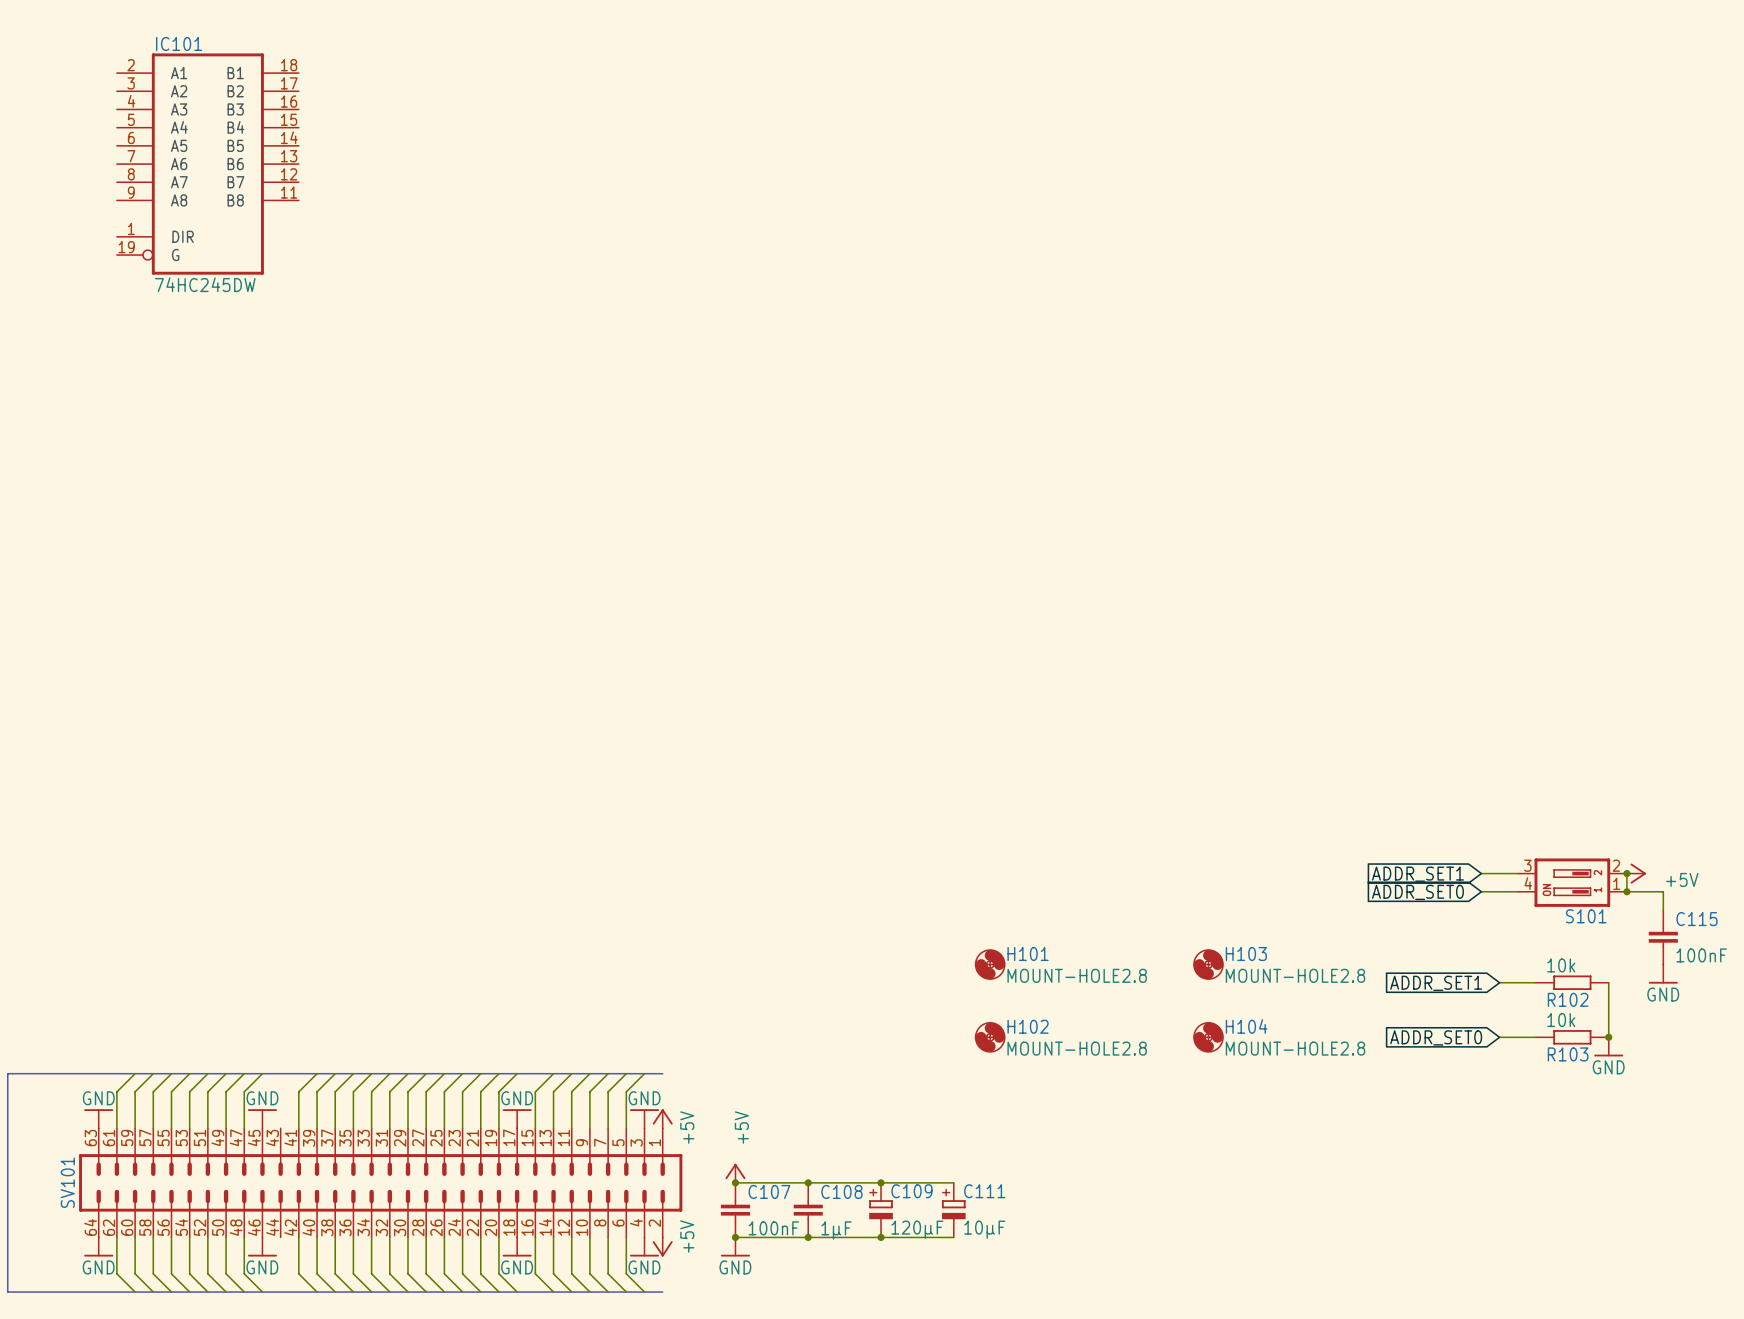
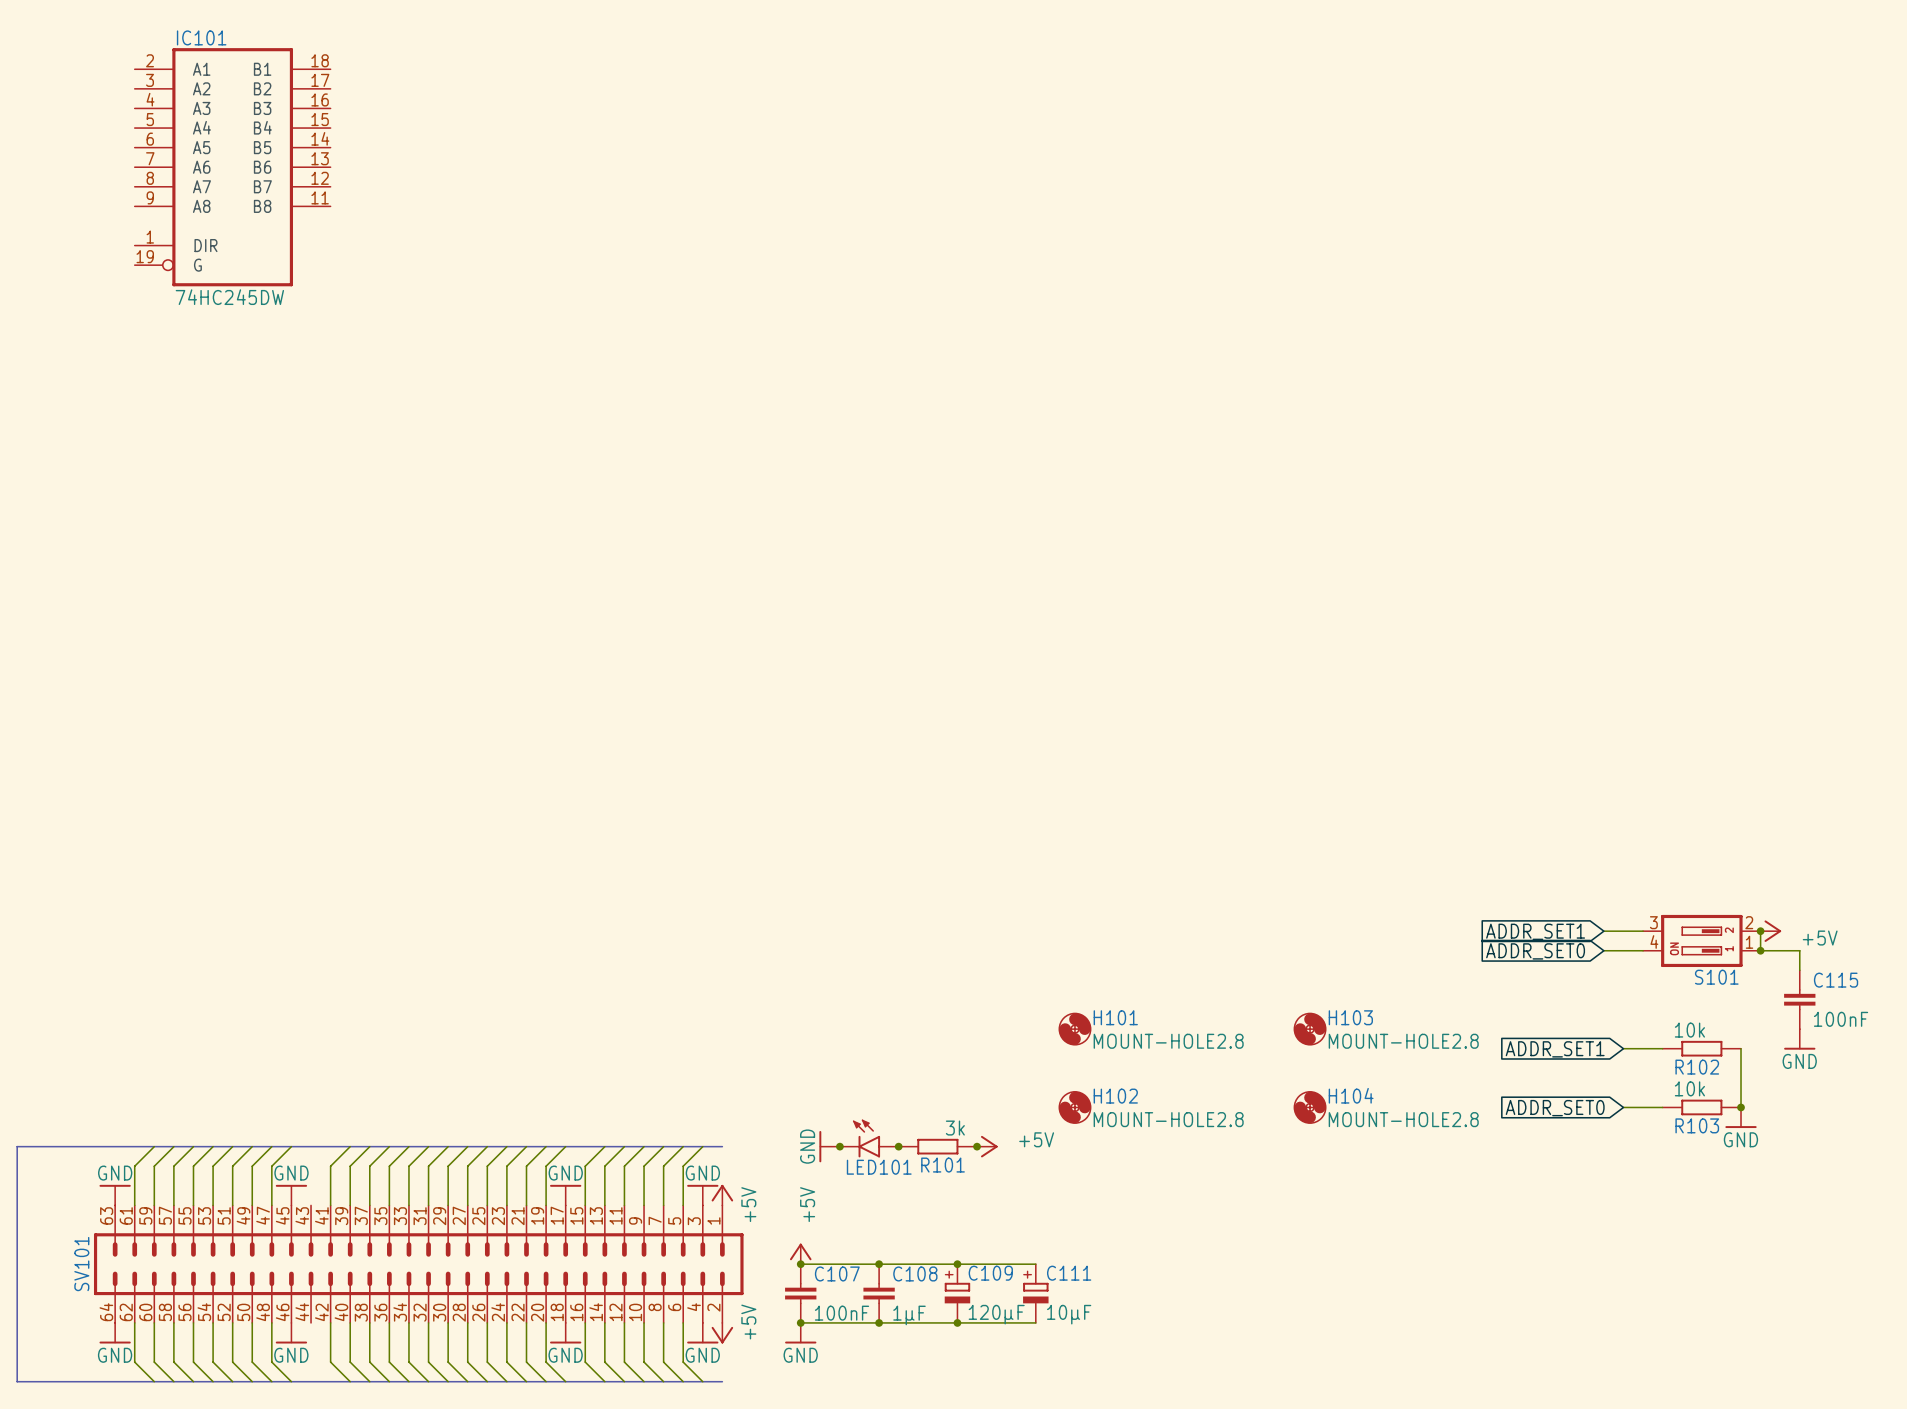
LED101: none -> (869, 1138)
power symbol: none -> GND (829, 1146)
junction: none -> (839, 1146)
junction: none -> (898, 1146)
R101: none -> 3k (937, 1146)
junction: none -> (977, 1146)
power symbol: none -> +5V (987, 1146)

